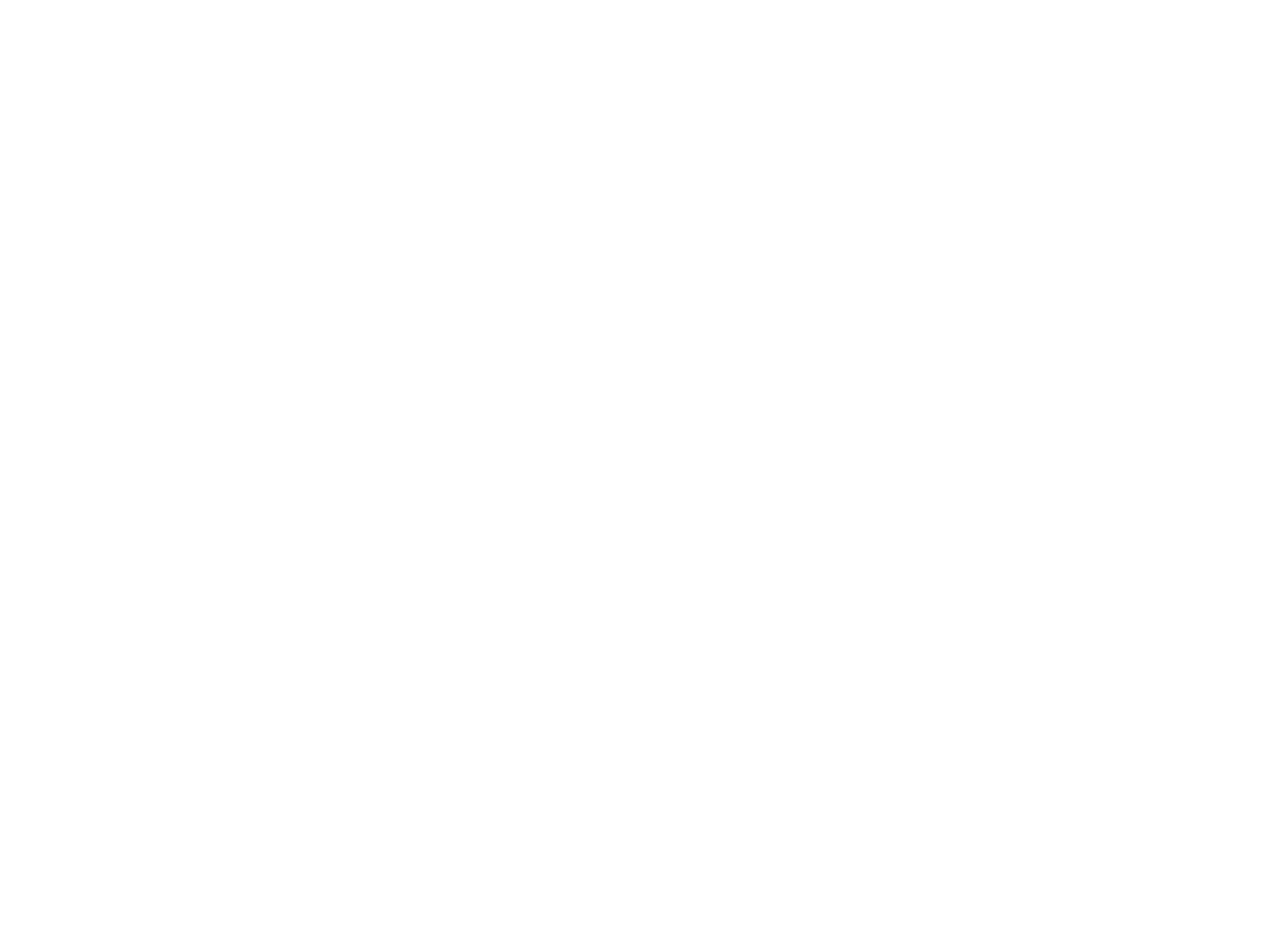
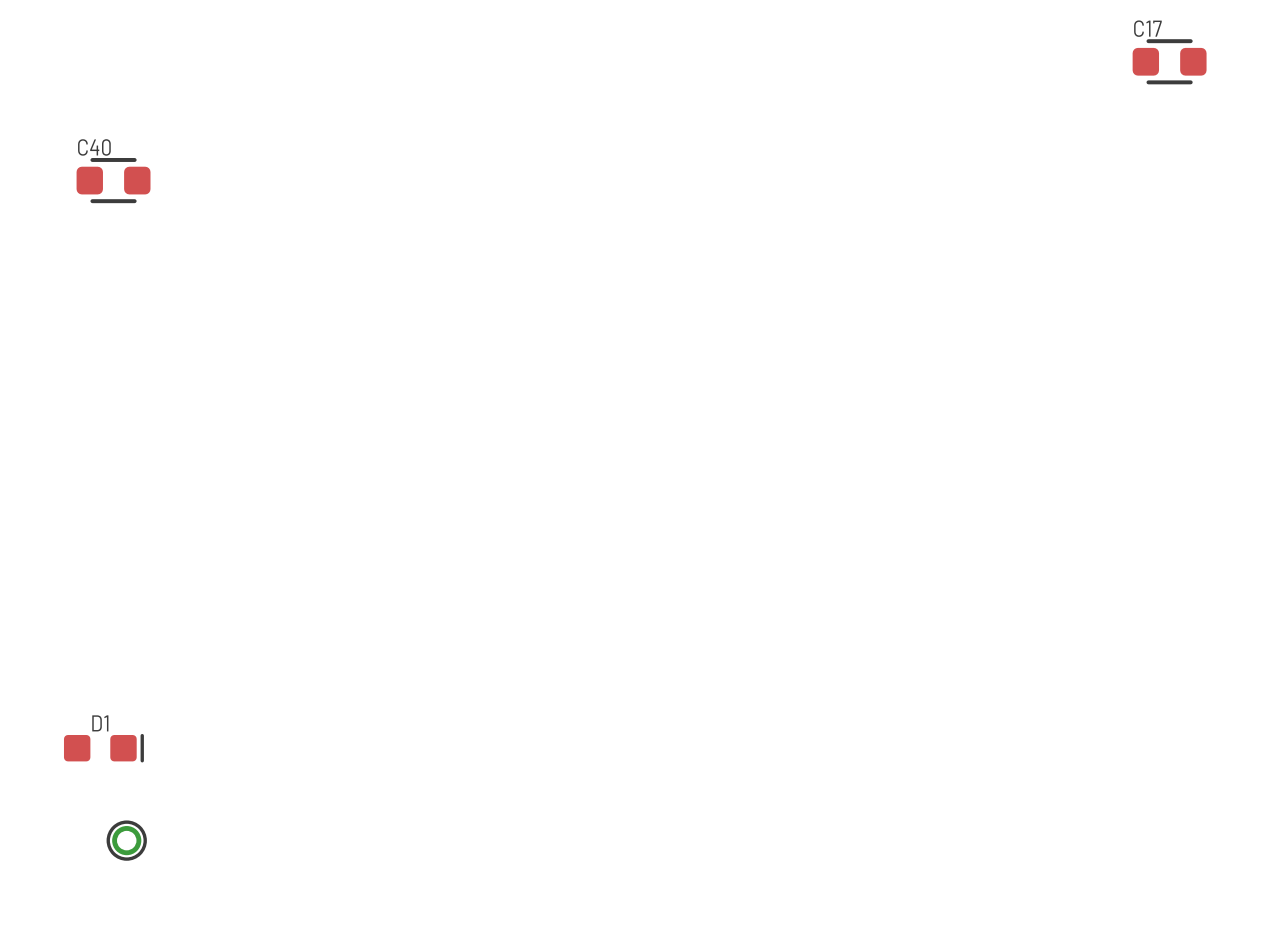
C17: none -> (1169, 61)
C40: none -> (113, 180)
D1: none -> (103, 748)
part: none -> (126, 840)

